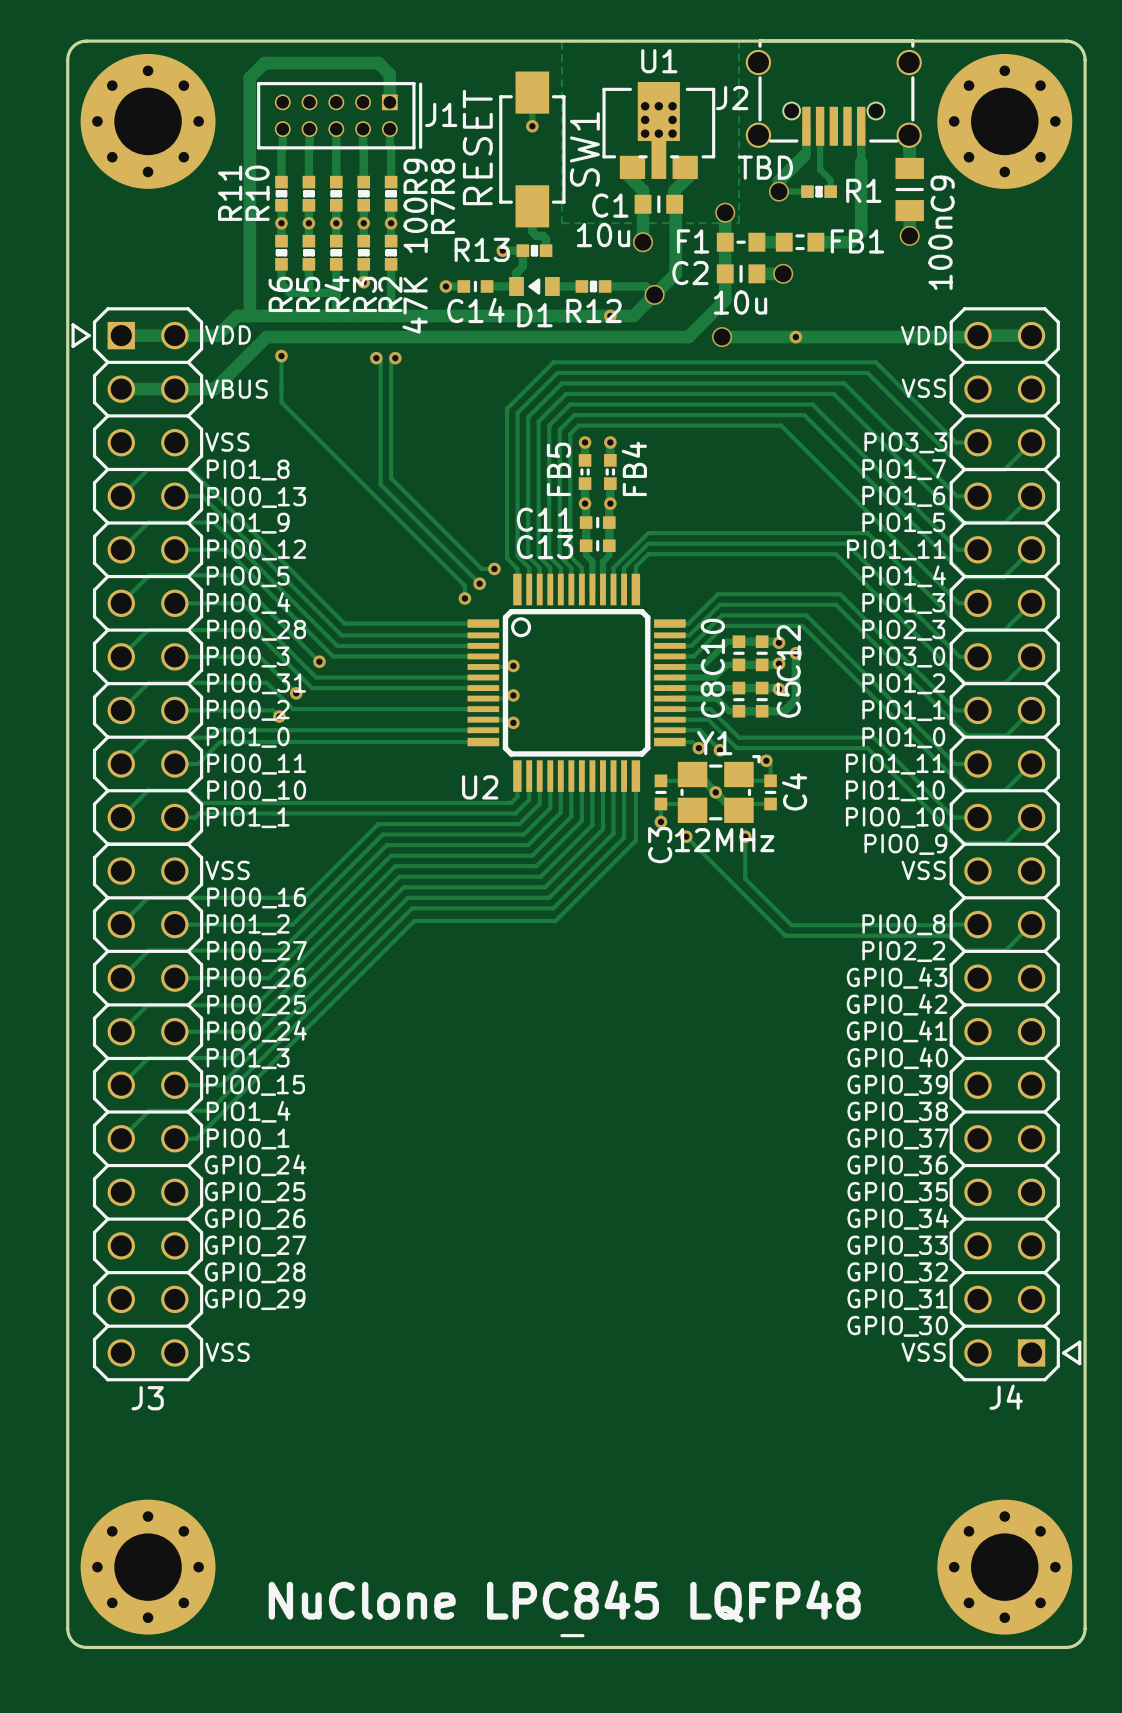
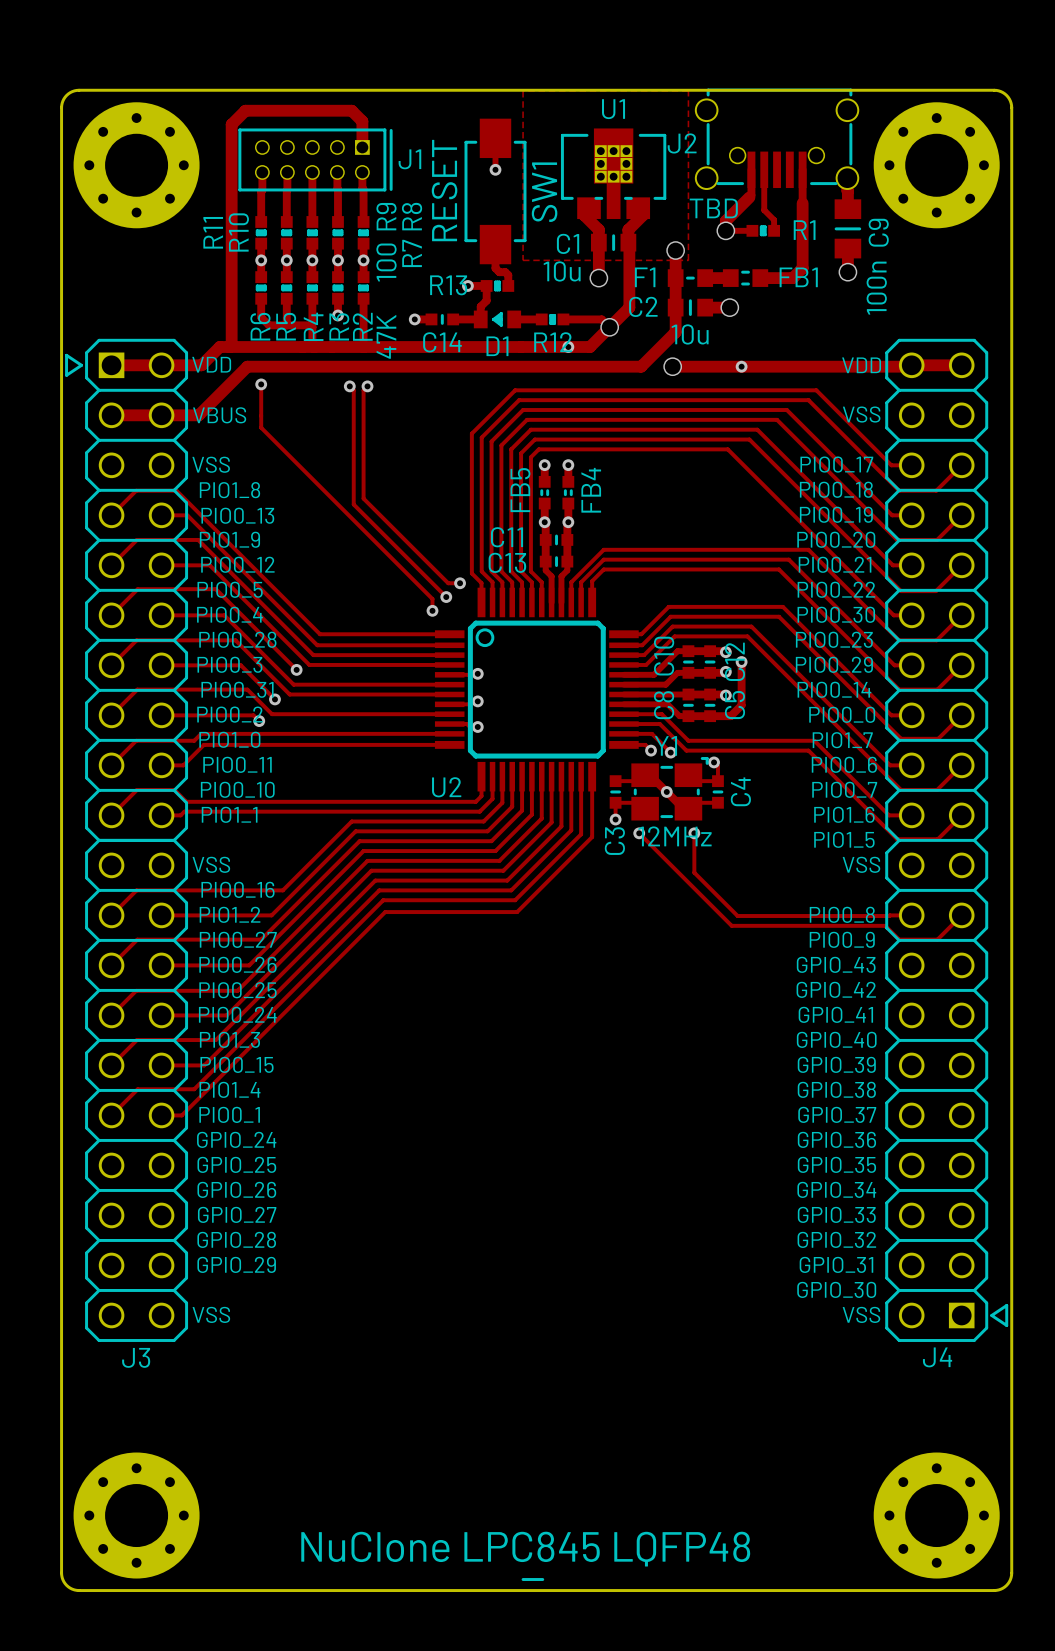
J4 footprint: [949, 307, 1082, 1382] -> [885, 338, 1009, 1342]

